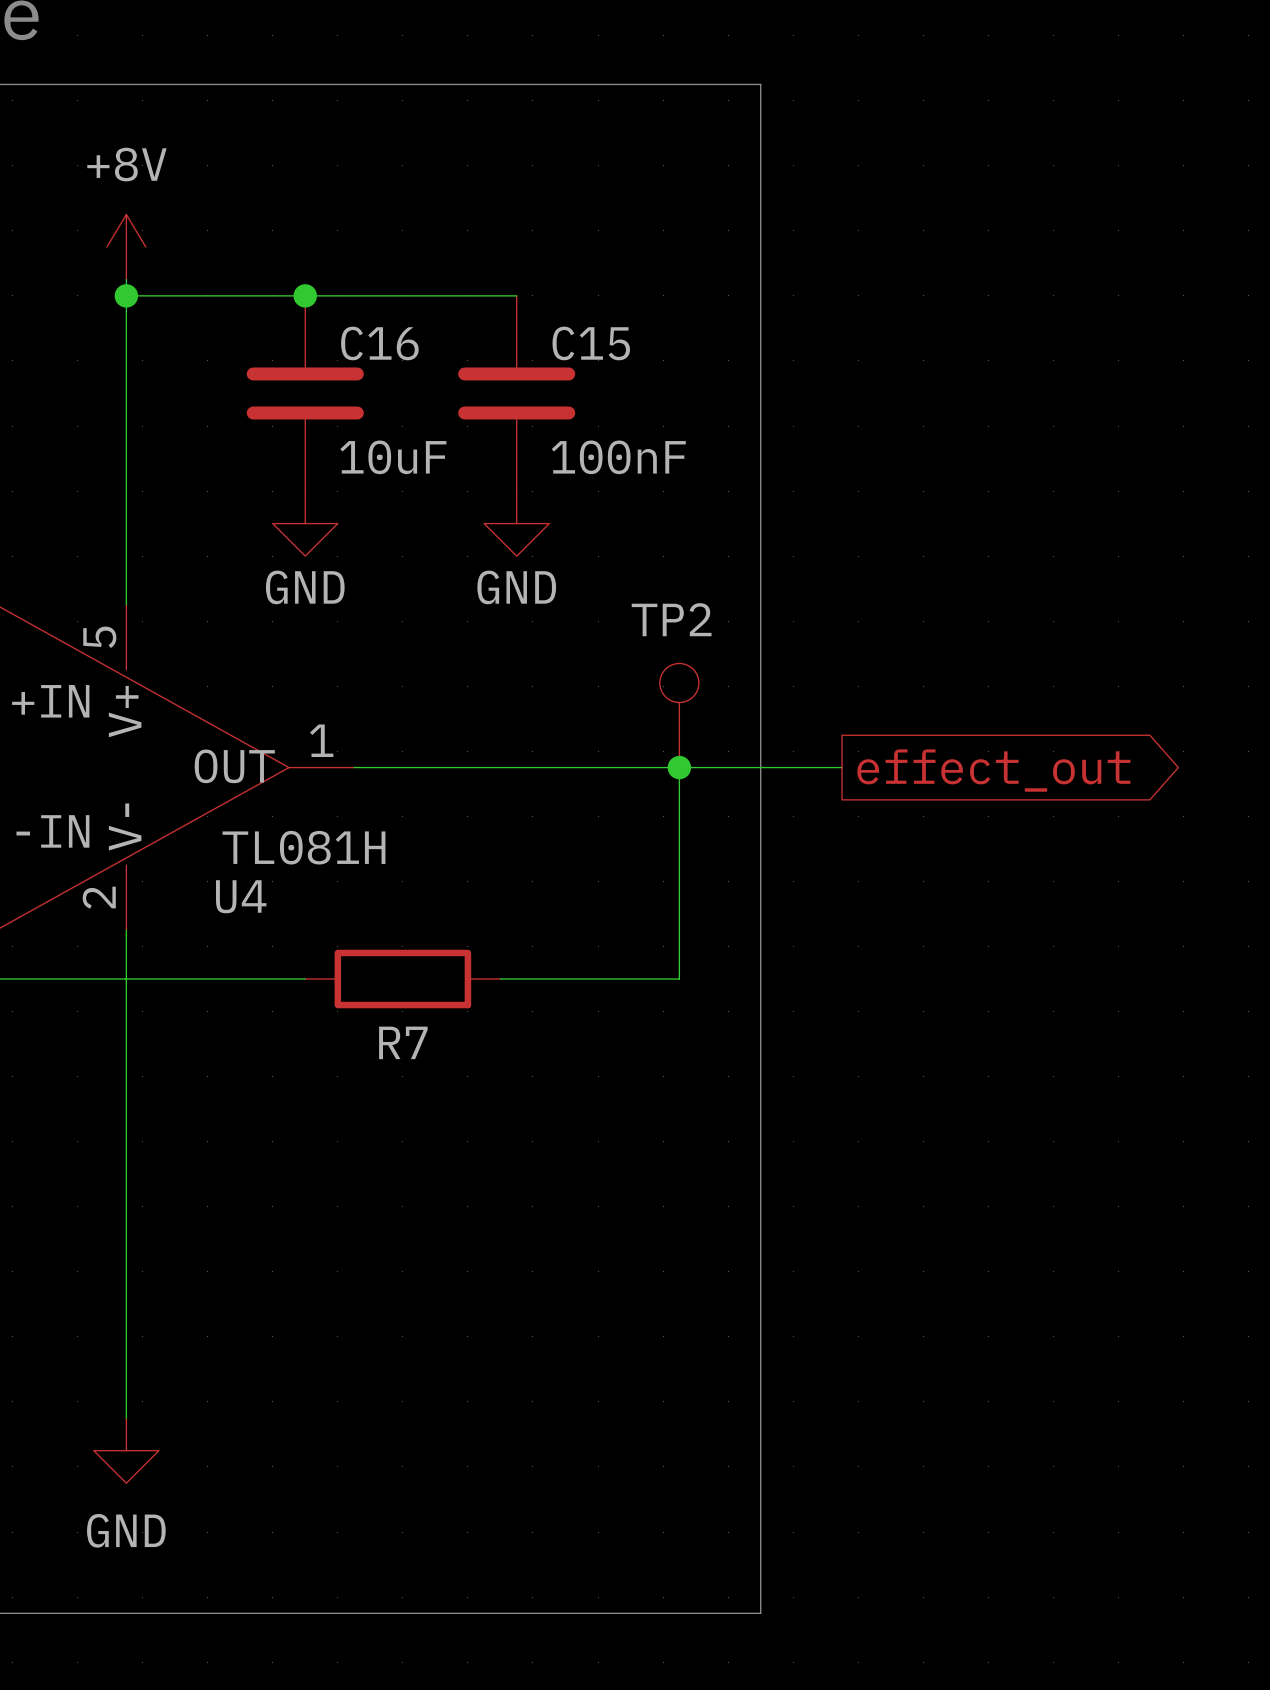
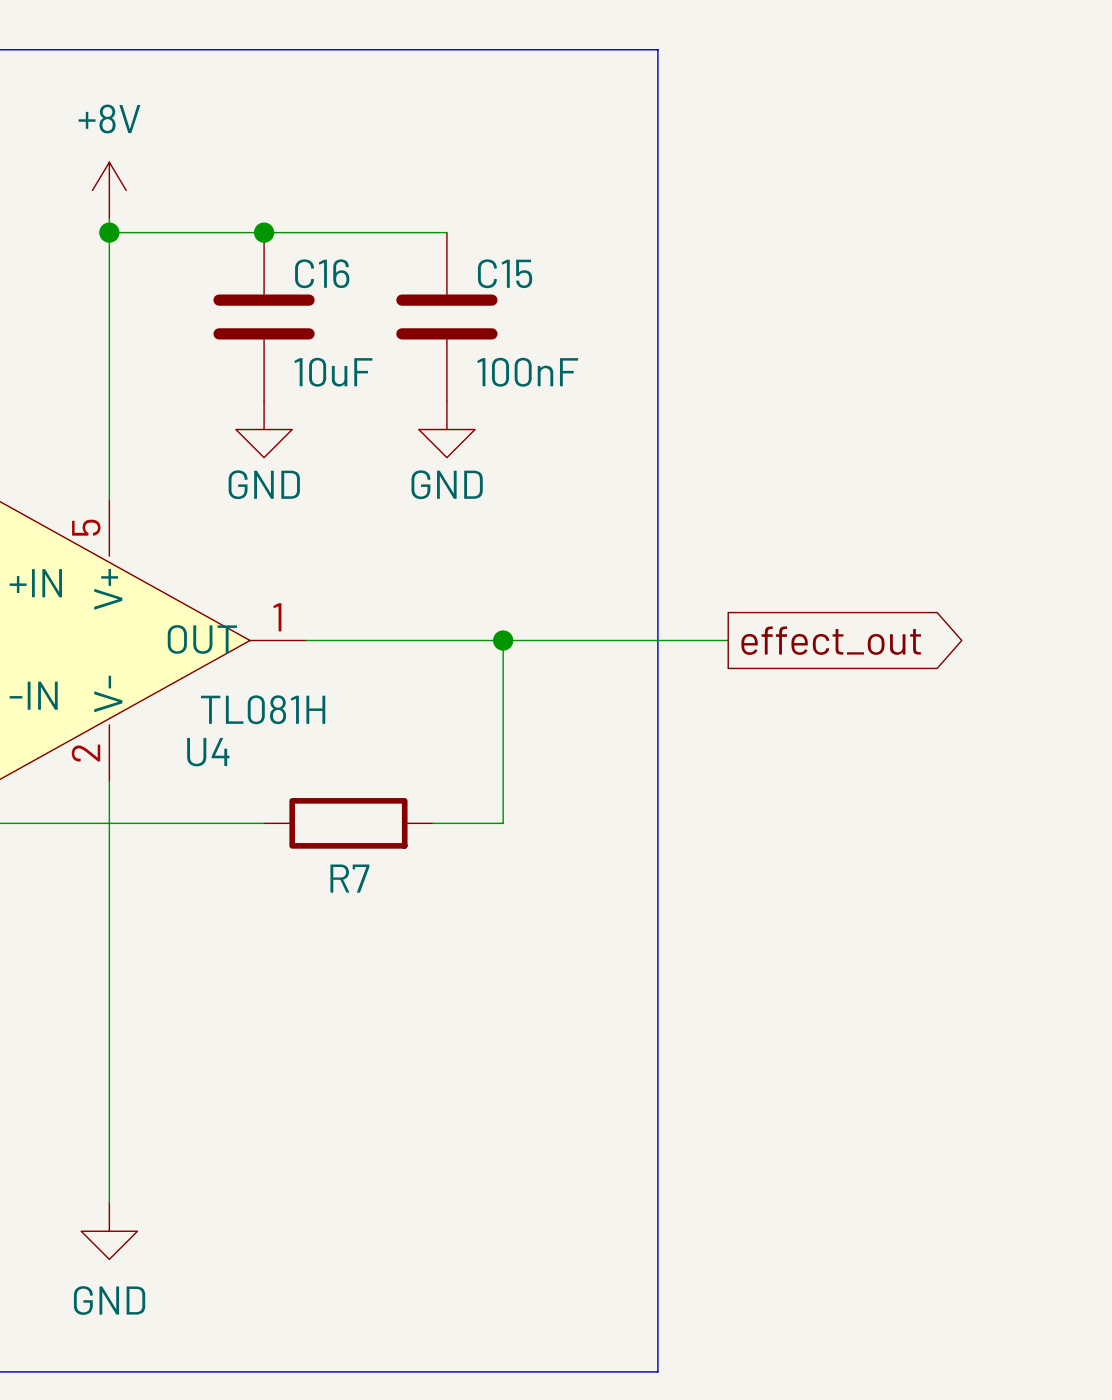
TP2: (679, 715) -> none
wire: (679, 767) (679, 979) (581, 979) -> (503, 640) (503, 823)
junction position: (679, 767) -> (503, 640)

